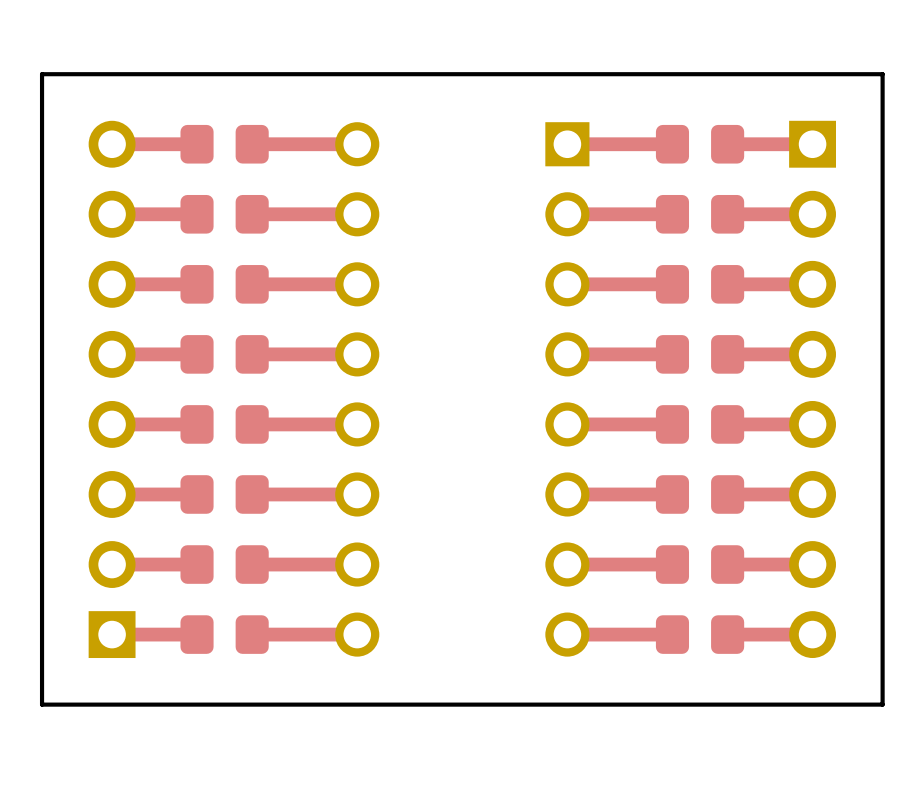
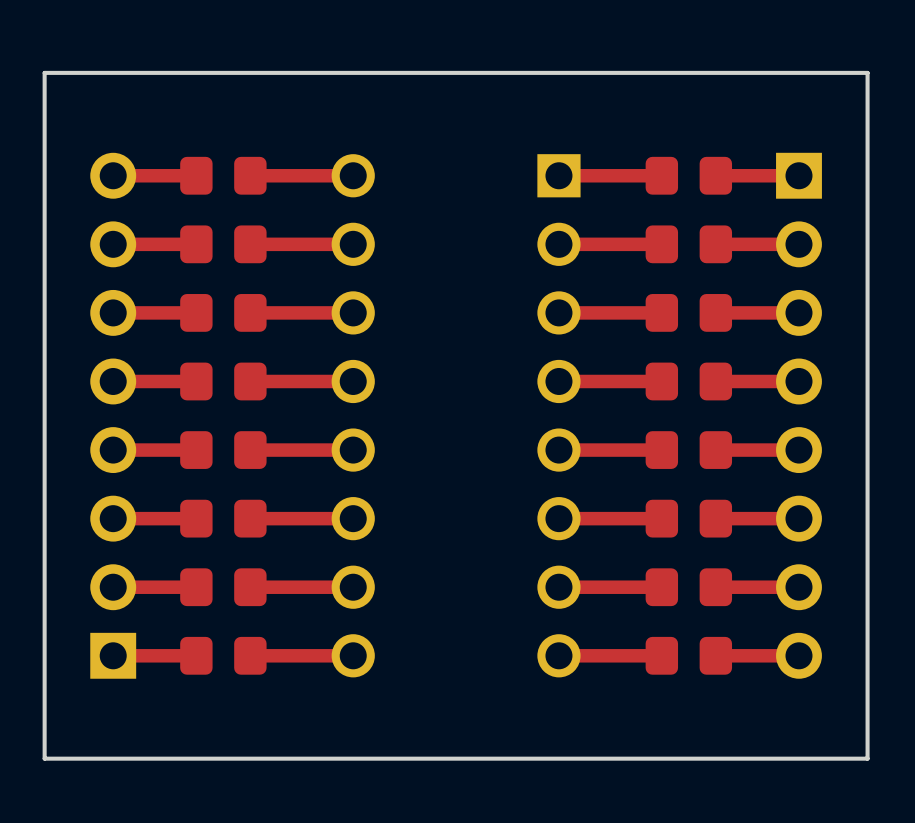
board edge: (882, 74) (42, 74) -> (867, 107) (867, 72) (44, 72) (44, 107)
board edge: (882, 704) (42, 704) -> (867, 724) (867, 758) (44, 758) (44, 724)

